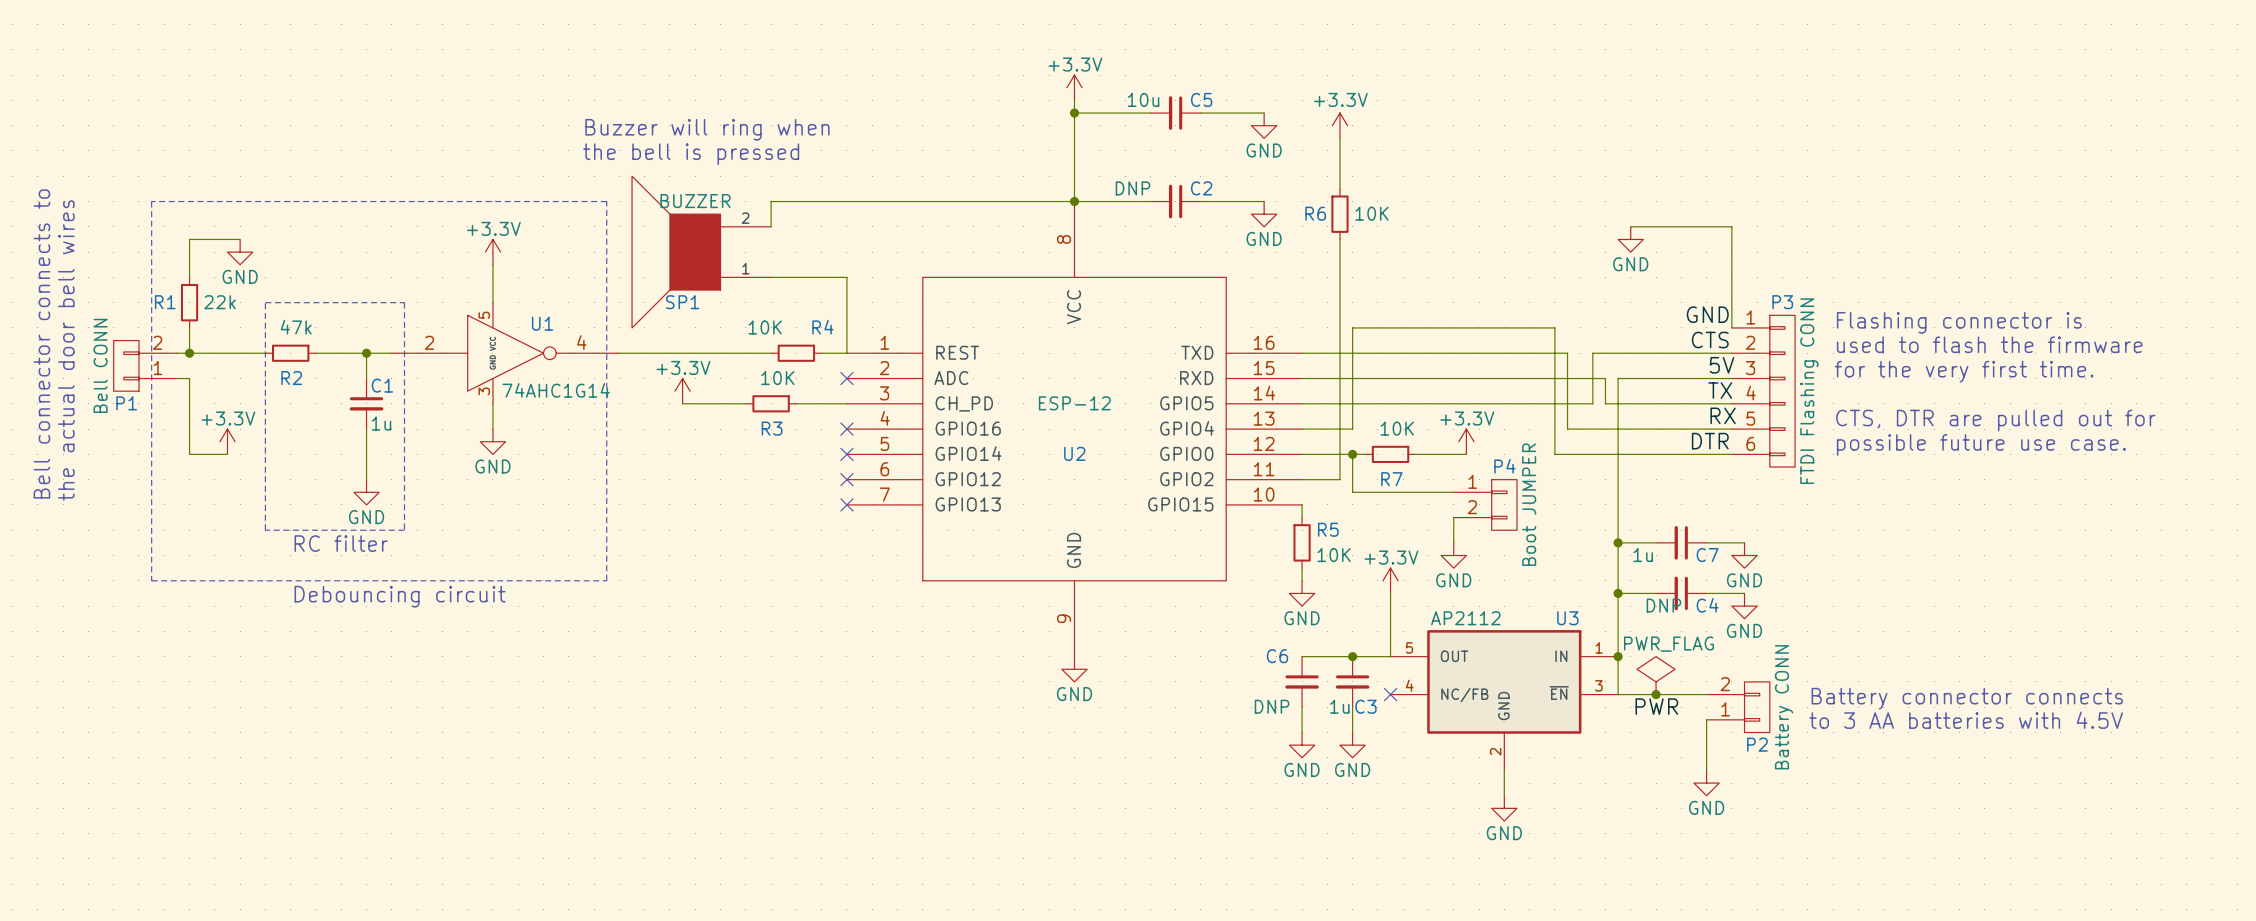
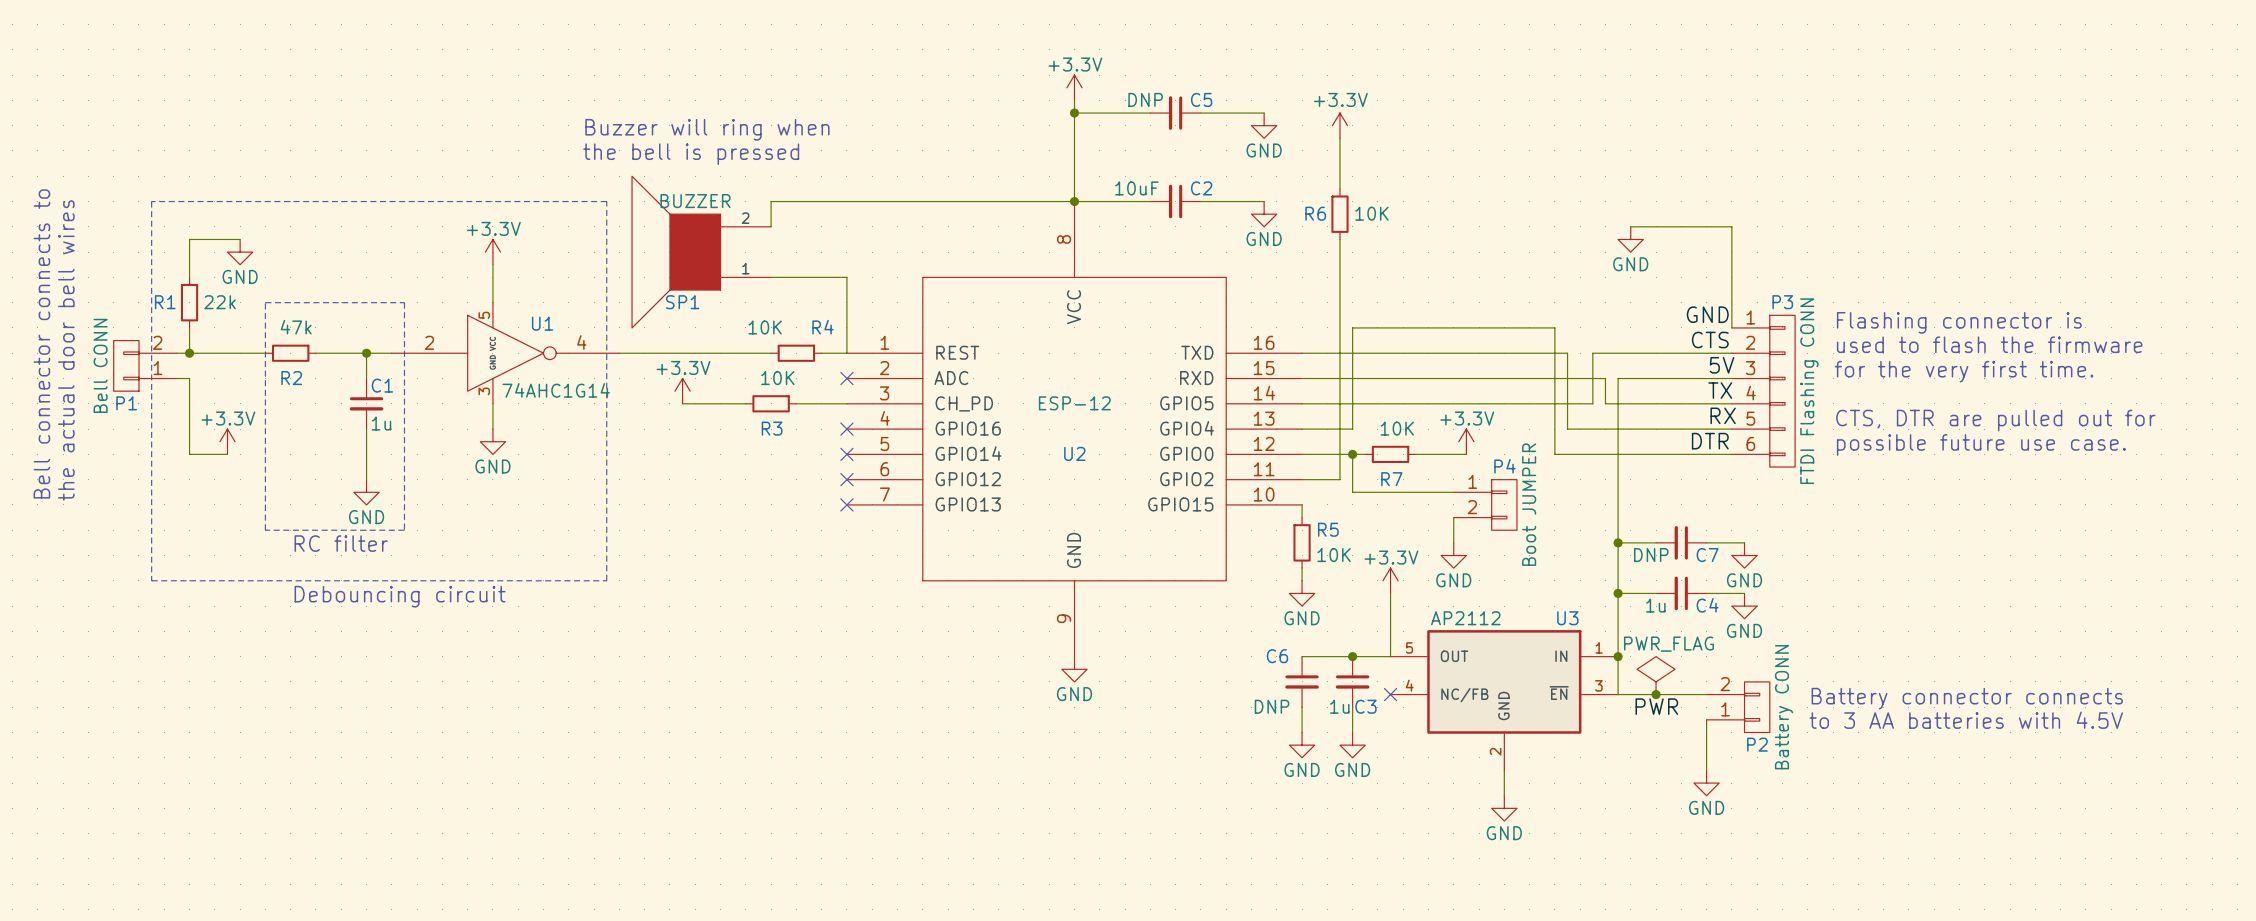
C5 value: 10u (1143, 99) -> DNP (1145, 99)
C2 value: DNP (1132, 188) -> 10uF (1136, 188)
C7 value: 1u (1643, 555) -> DNP (1651, 555)
C4 value: DNP (1663, 605) -> 1u (1655, 605)

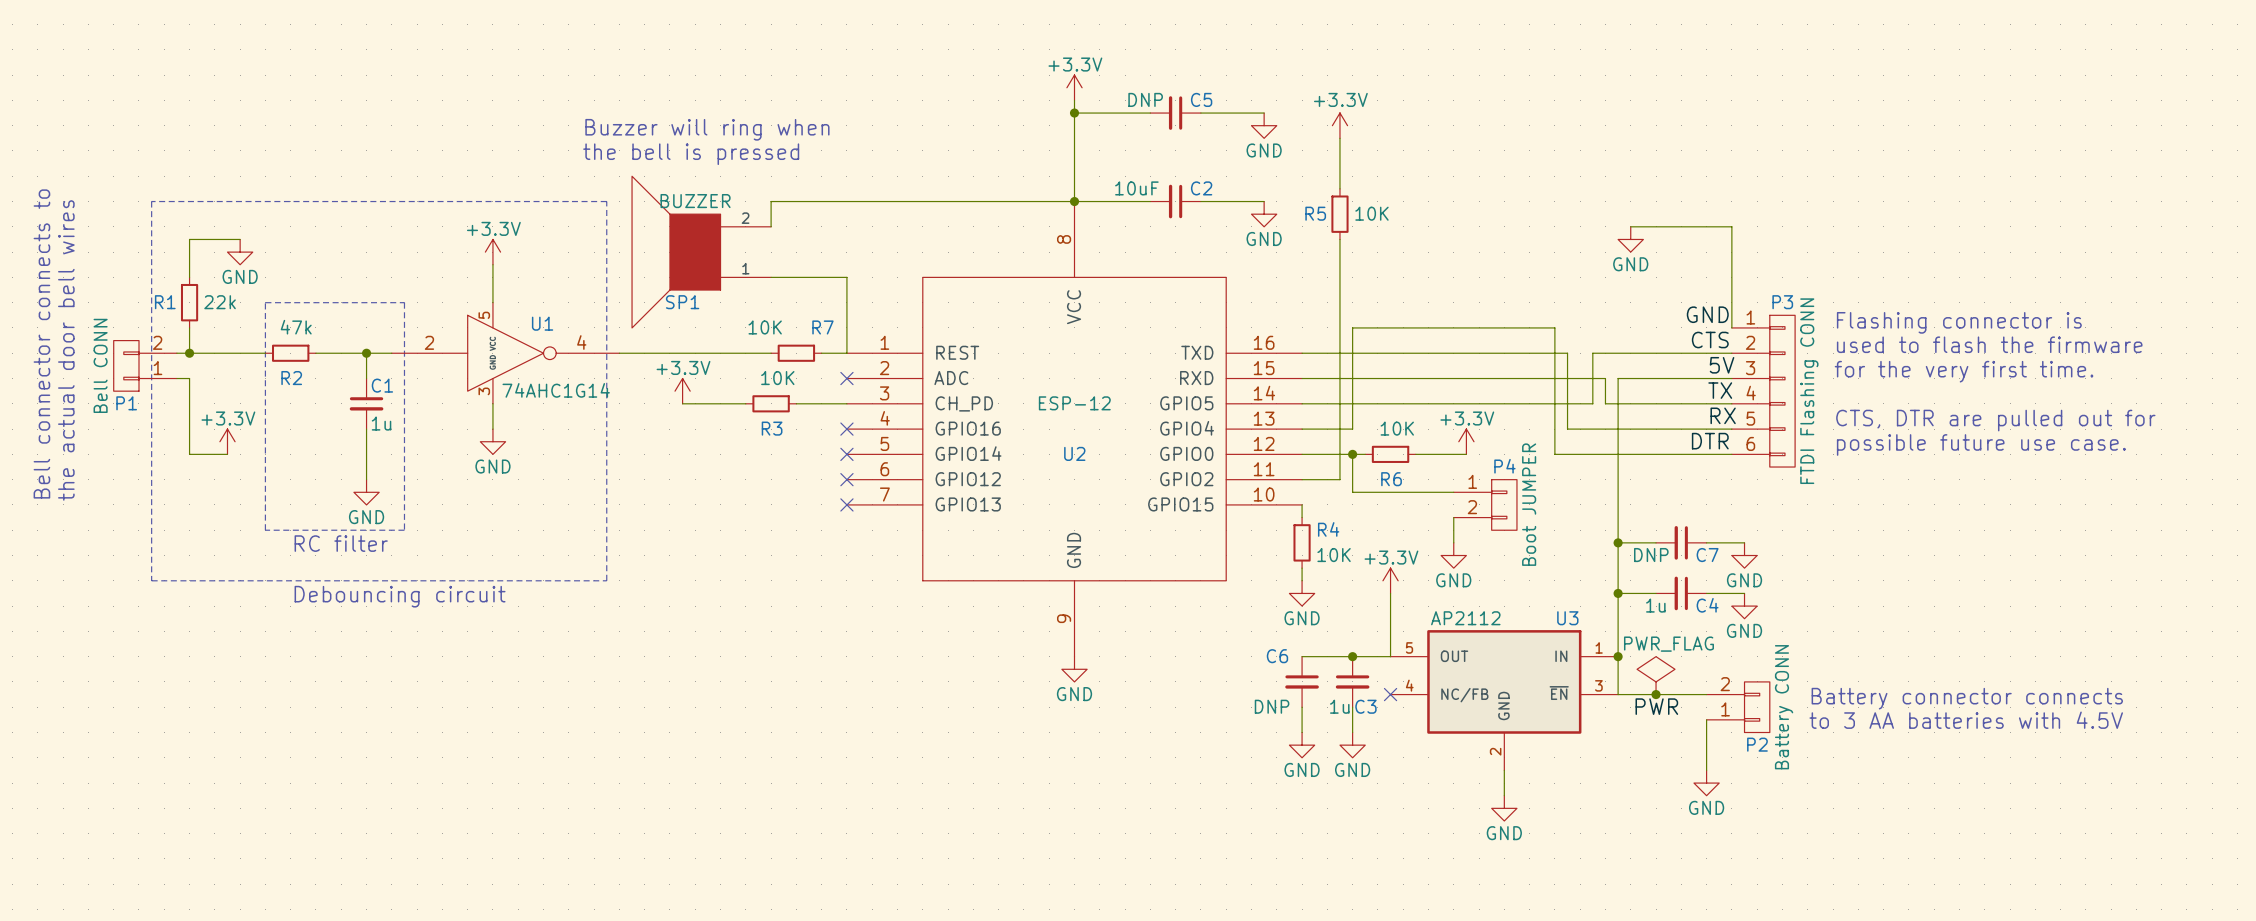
R6 name: R6 (1315, 213) -> R5 (1315, 213)
R4 name: R4 (822, 327) -> R7 (822, 327)
R7 name: R7 (1391, 479) -> R6 (1391, 479)
R5 name: R5 (1328, 529) -> R4 (1328, 529)

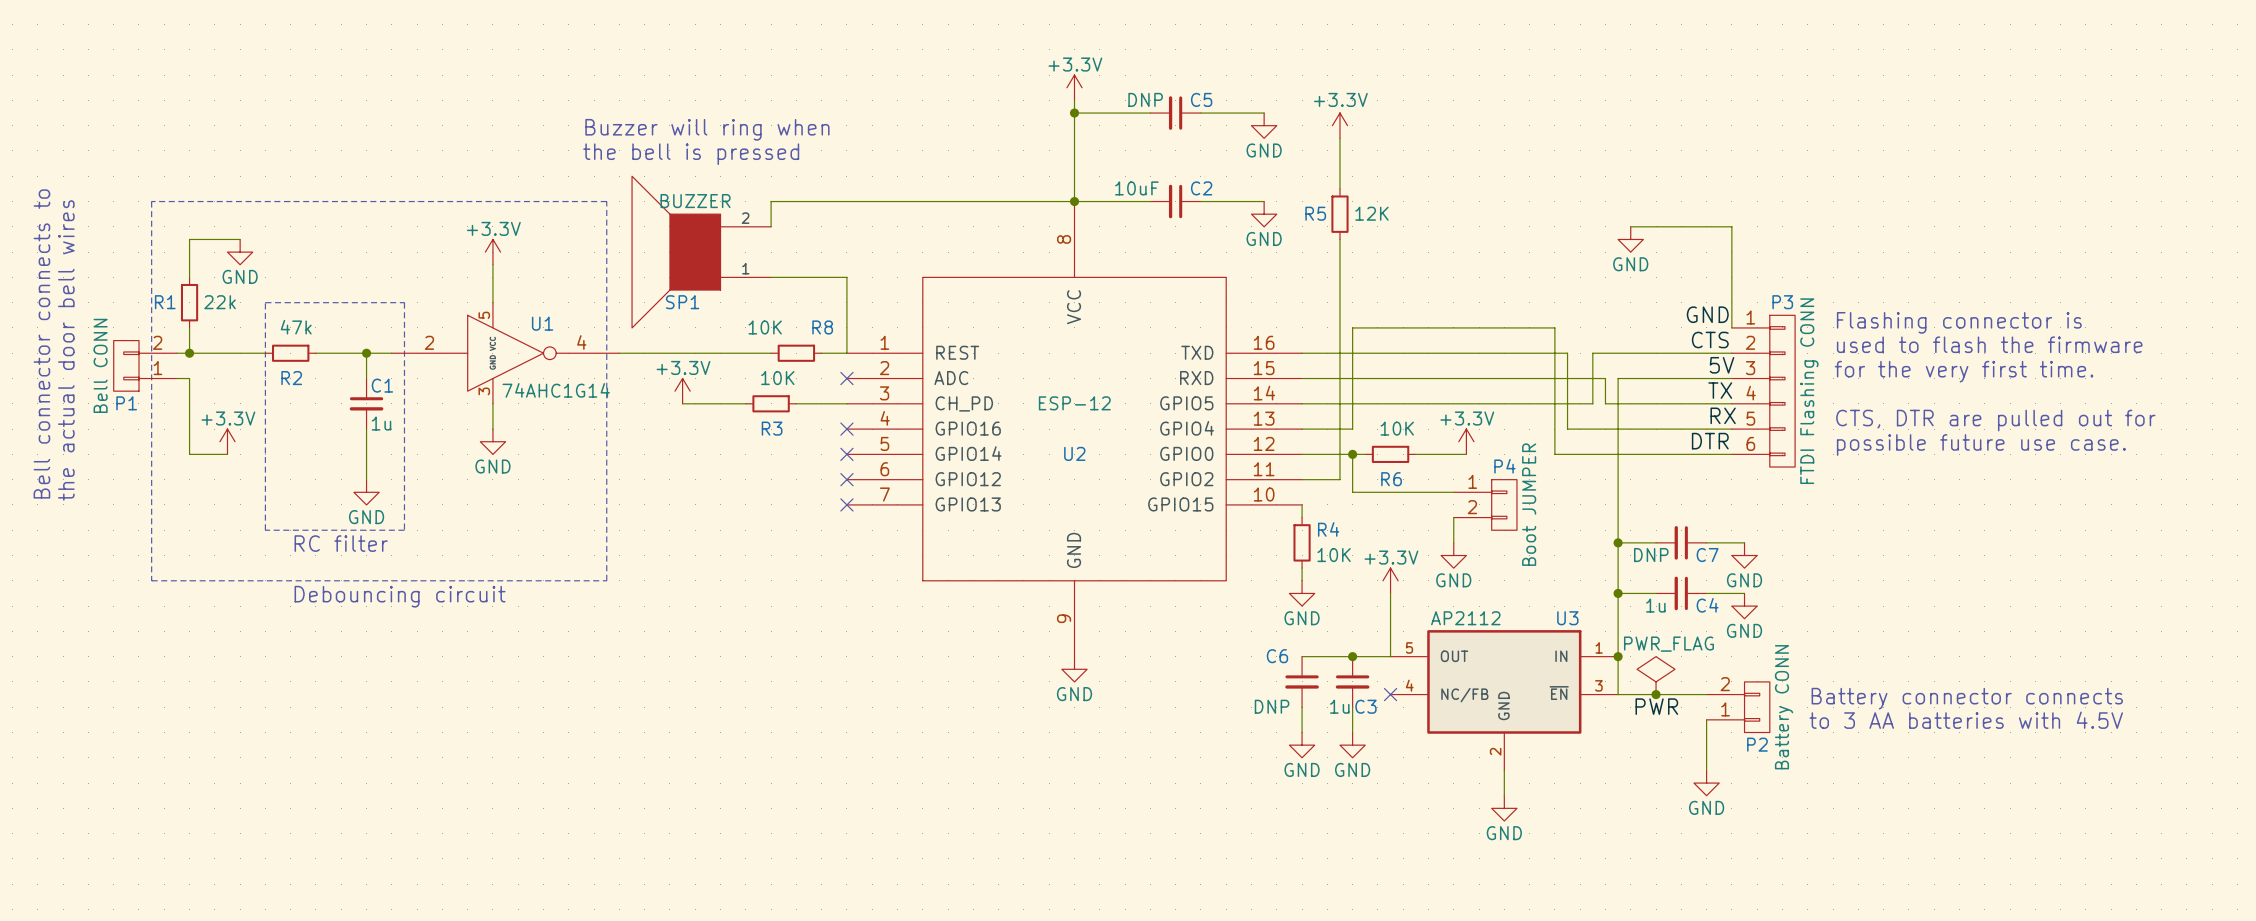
R5 value: 10K (1371, 213) -> 12K (1371, 213)
R7 name: R7 (822, 327) -> R8 (822, 327)

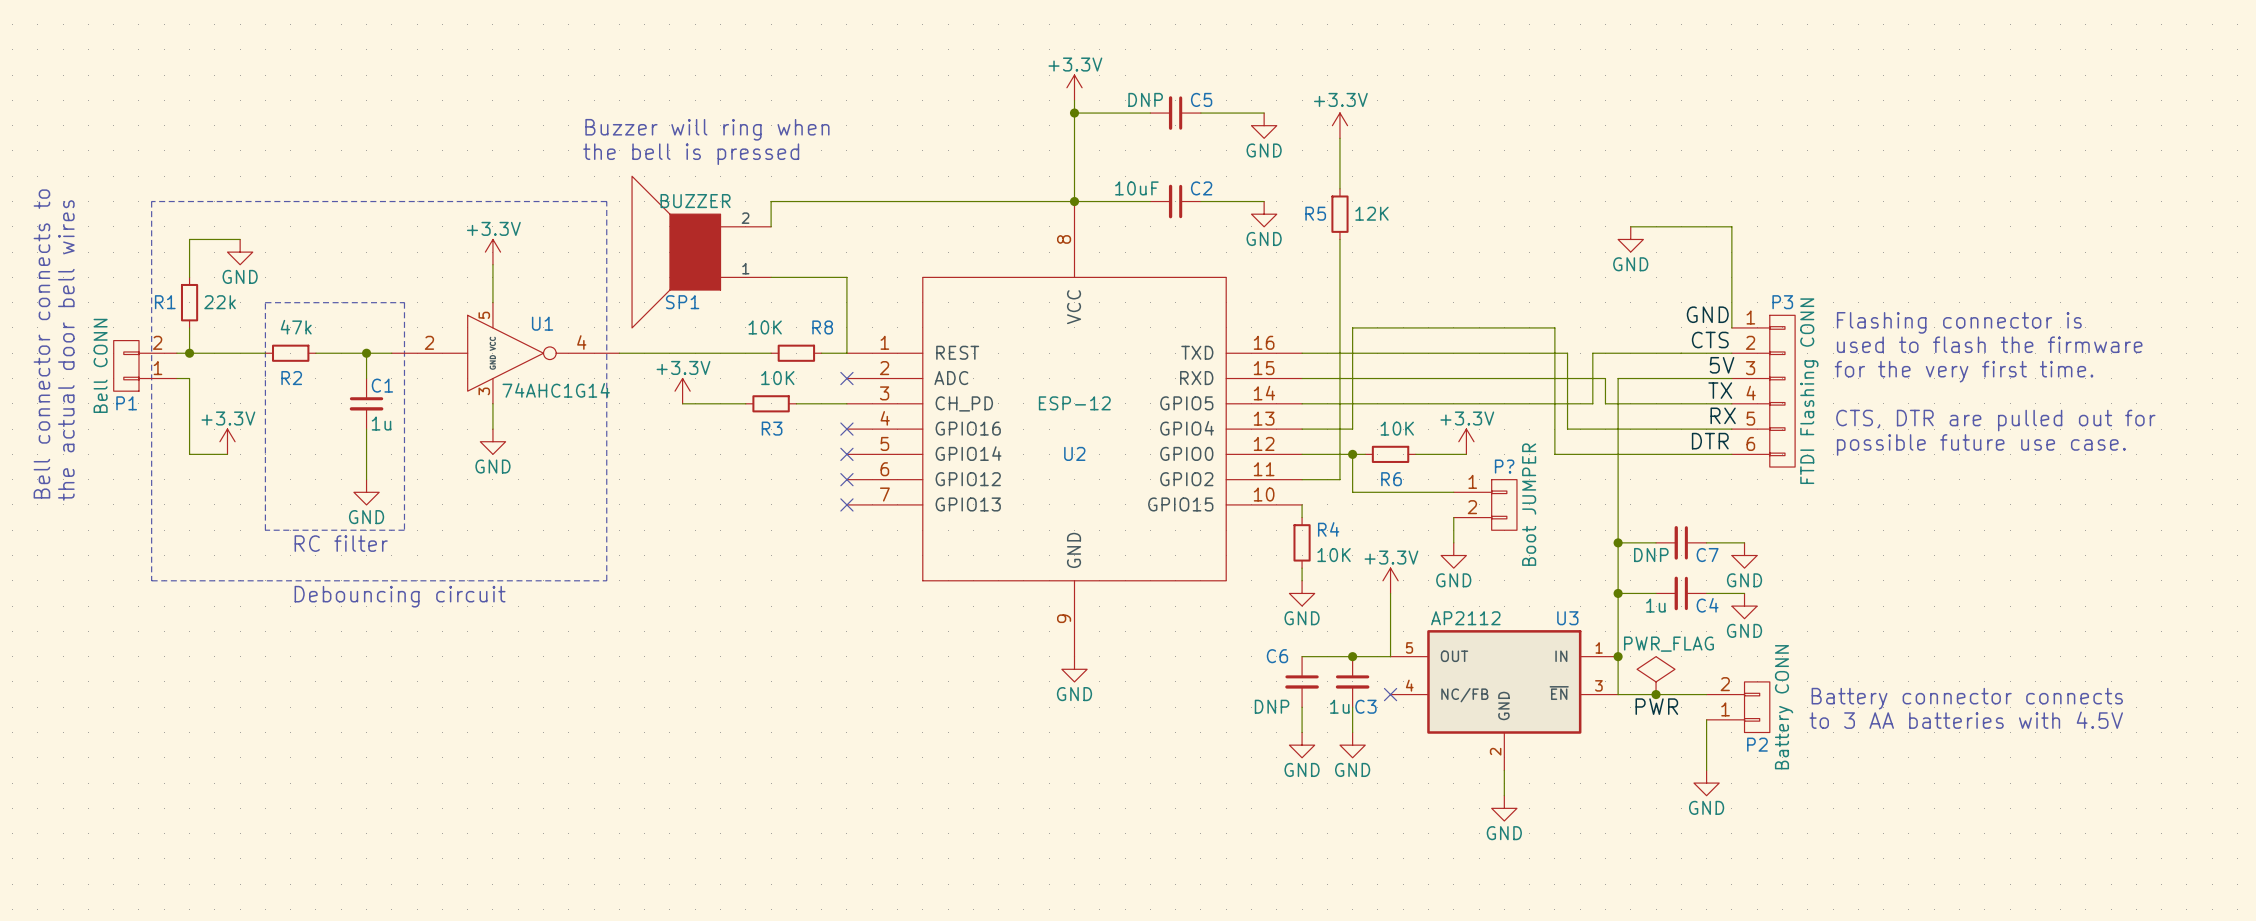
P4 name: P4 (1504, 466) -> P? (1504, 466)

